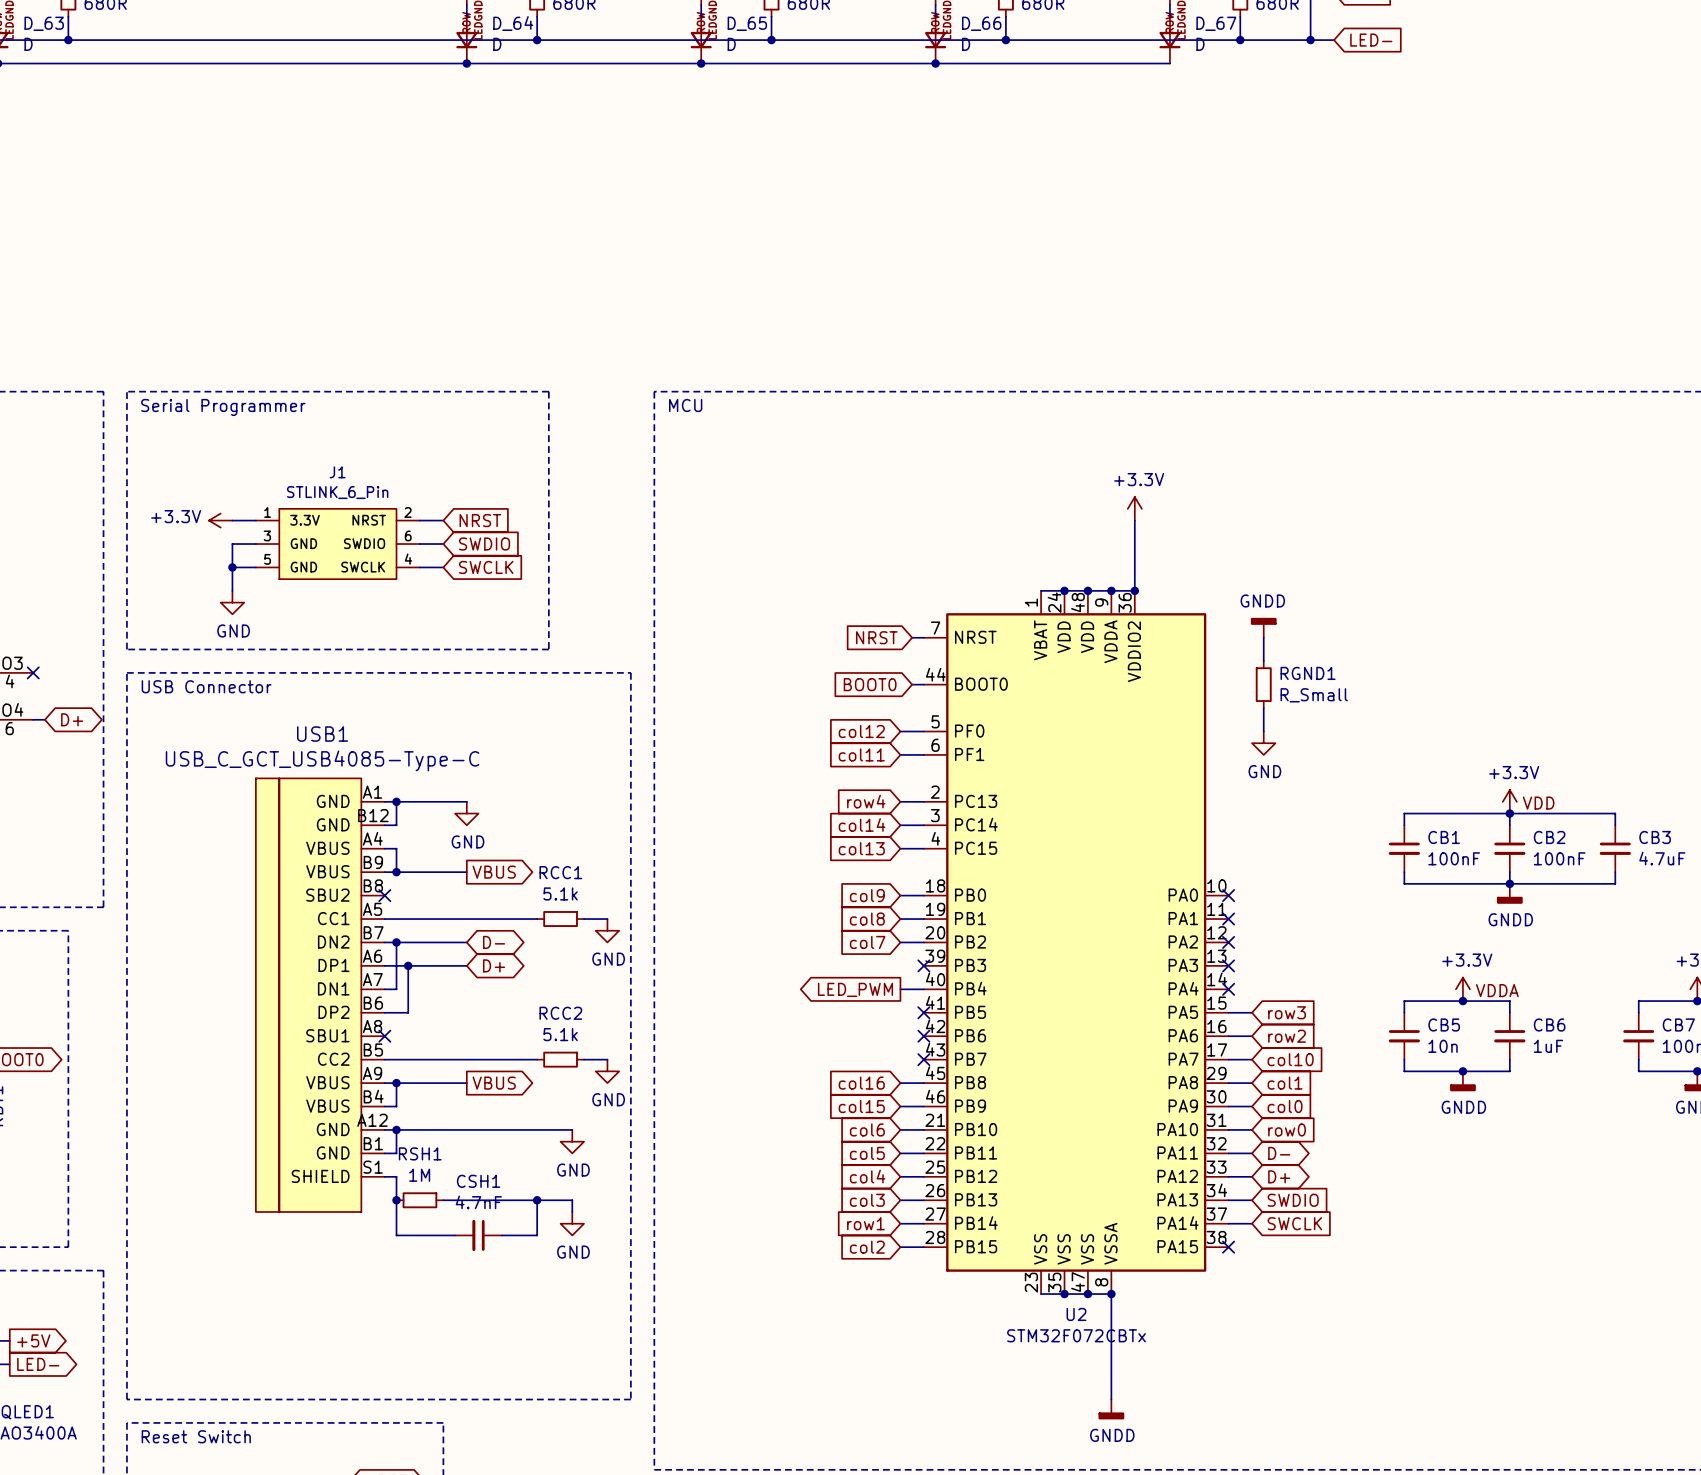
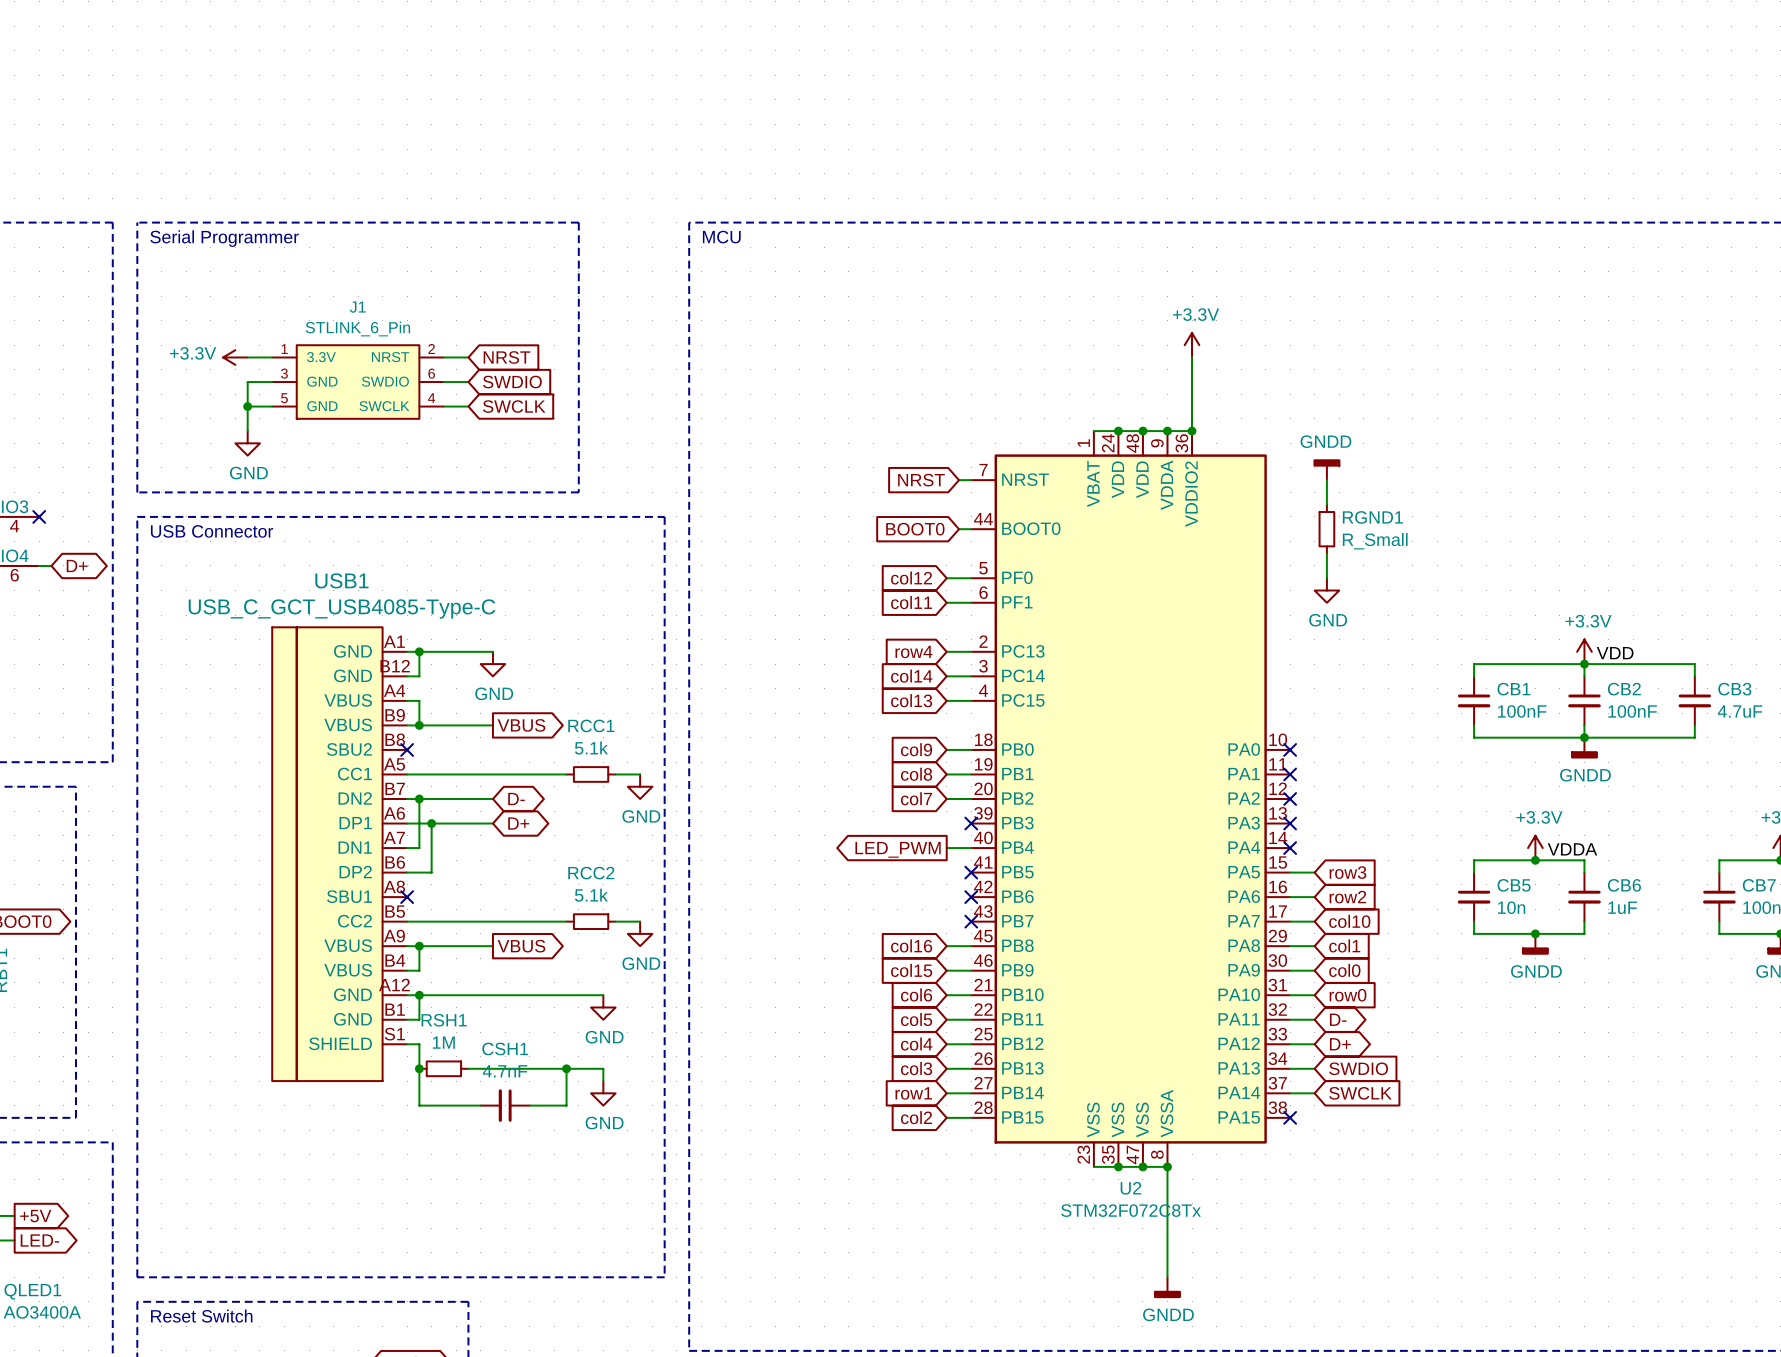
U2 value: STM32F072CBTx (1076, 1335) -> STM32F072C8Tx (1131, 1210)

